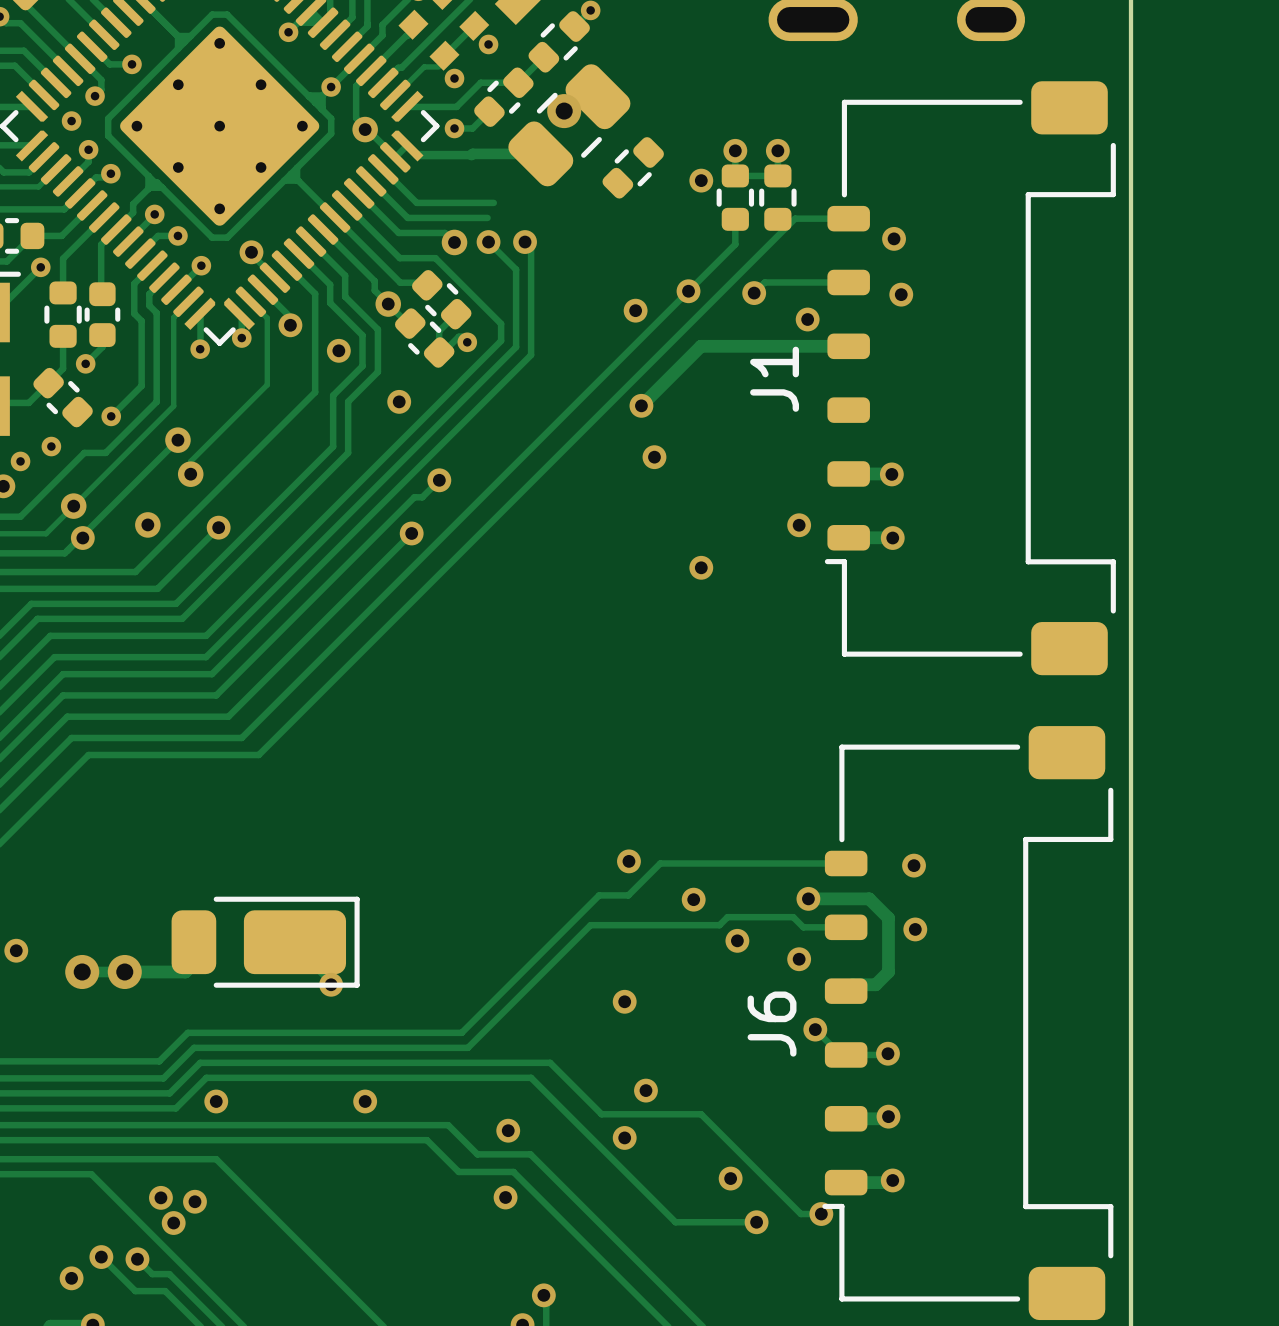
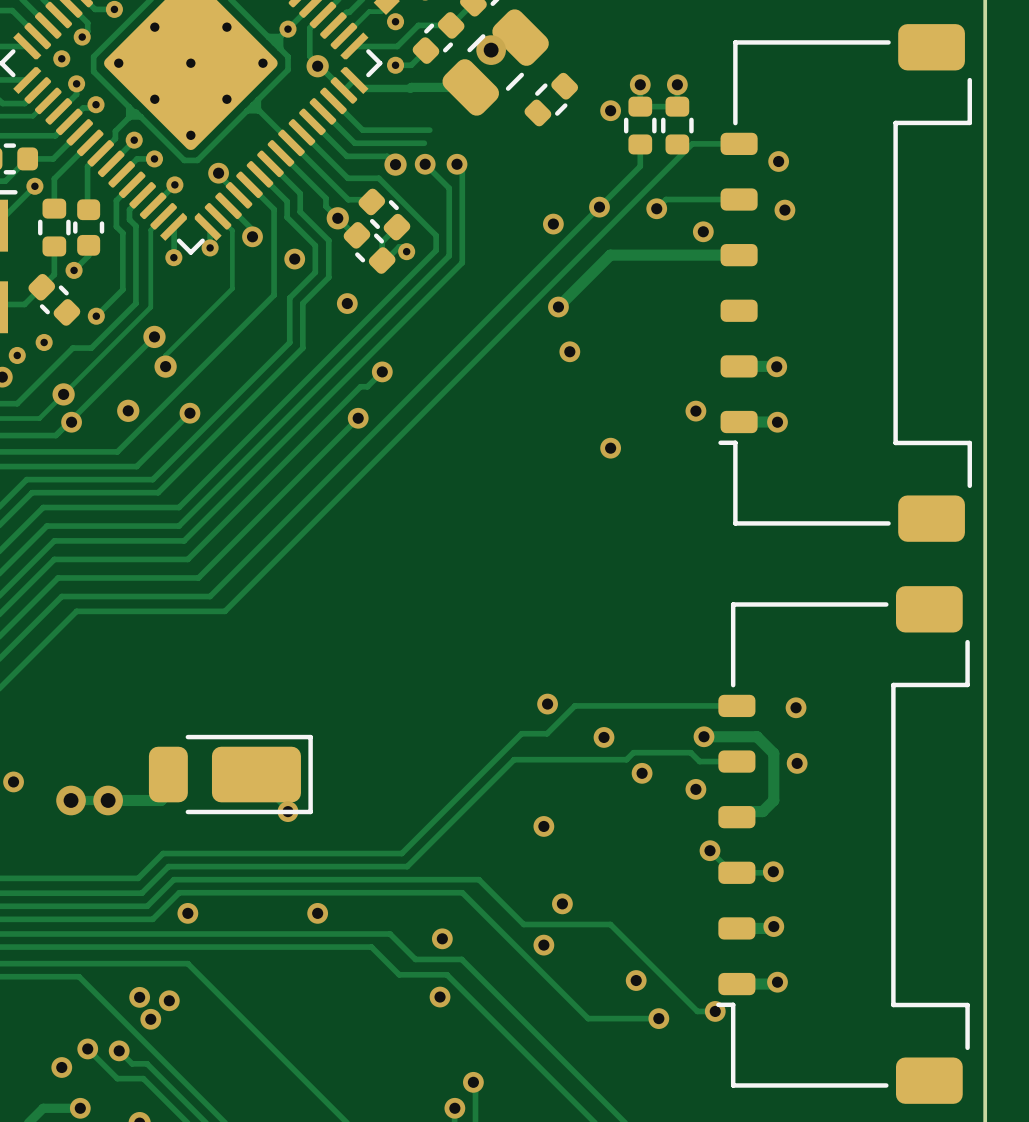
J1 name: J1 (774, 379) -> none
J6 name: J6 (772, 1024) -> none

